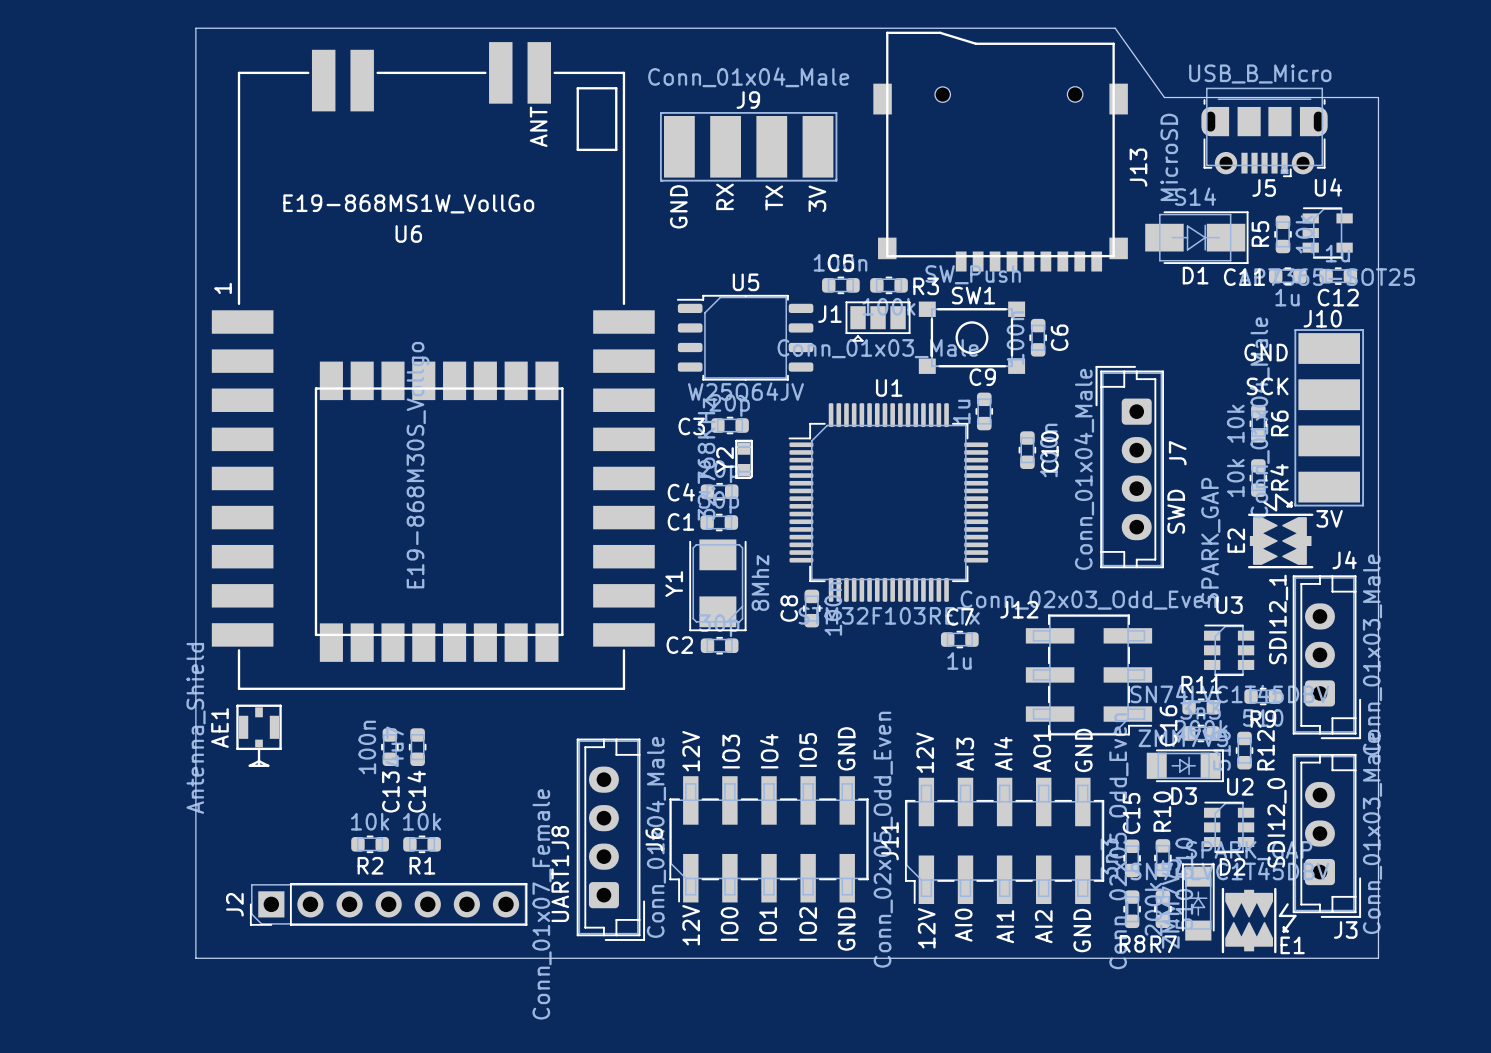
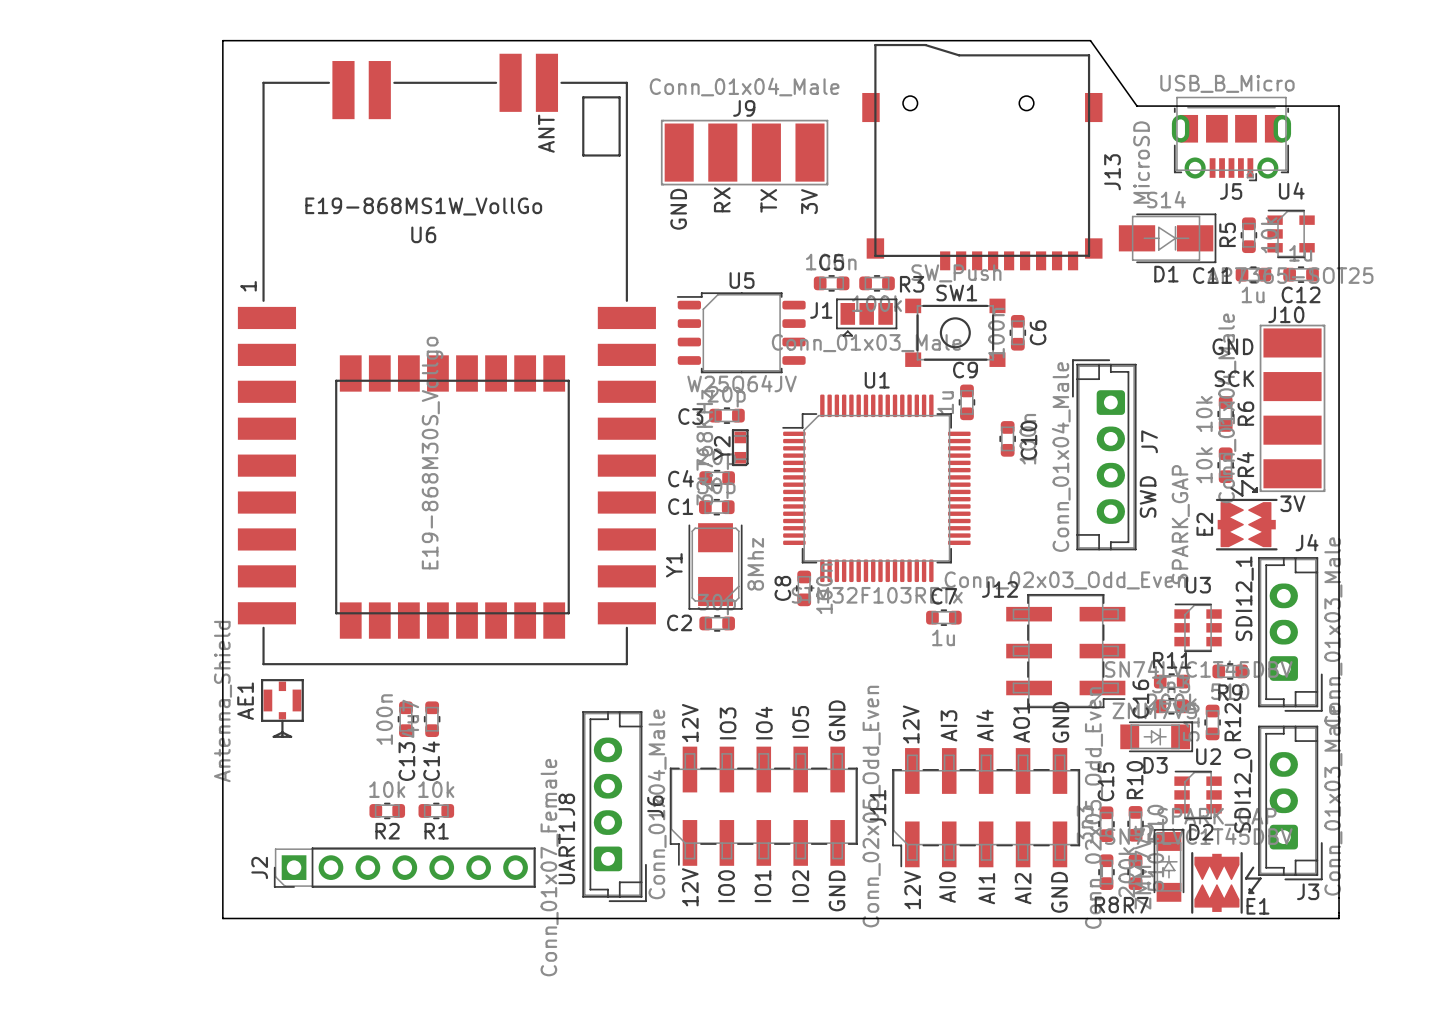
J13 footprint: [873, 31, 1128, 272] -> [862, 43, 1103, 271]

